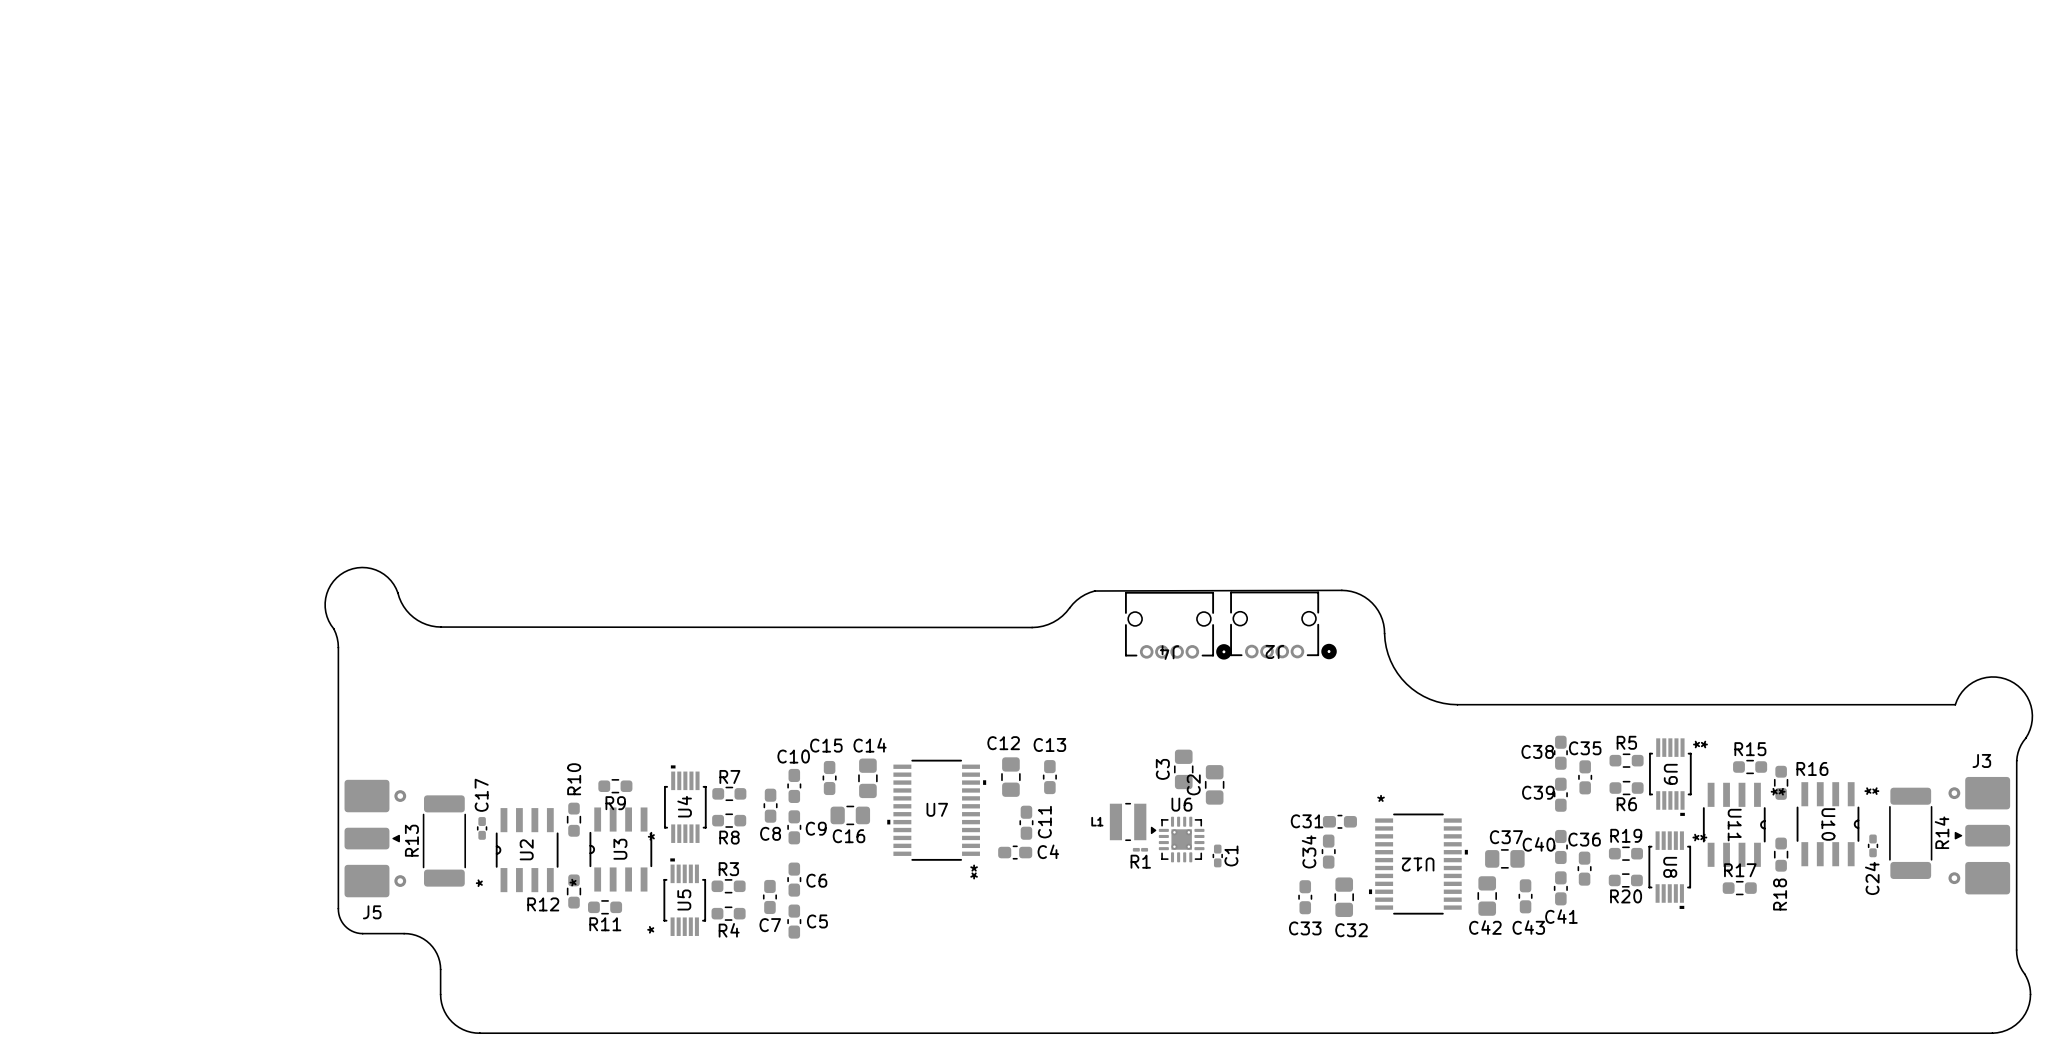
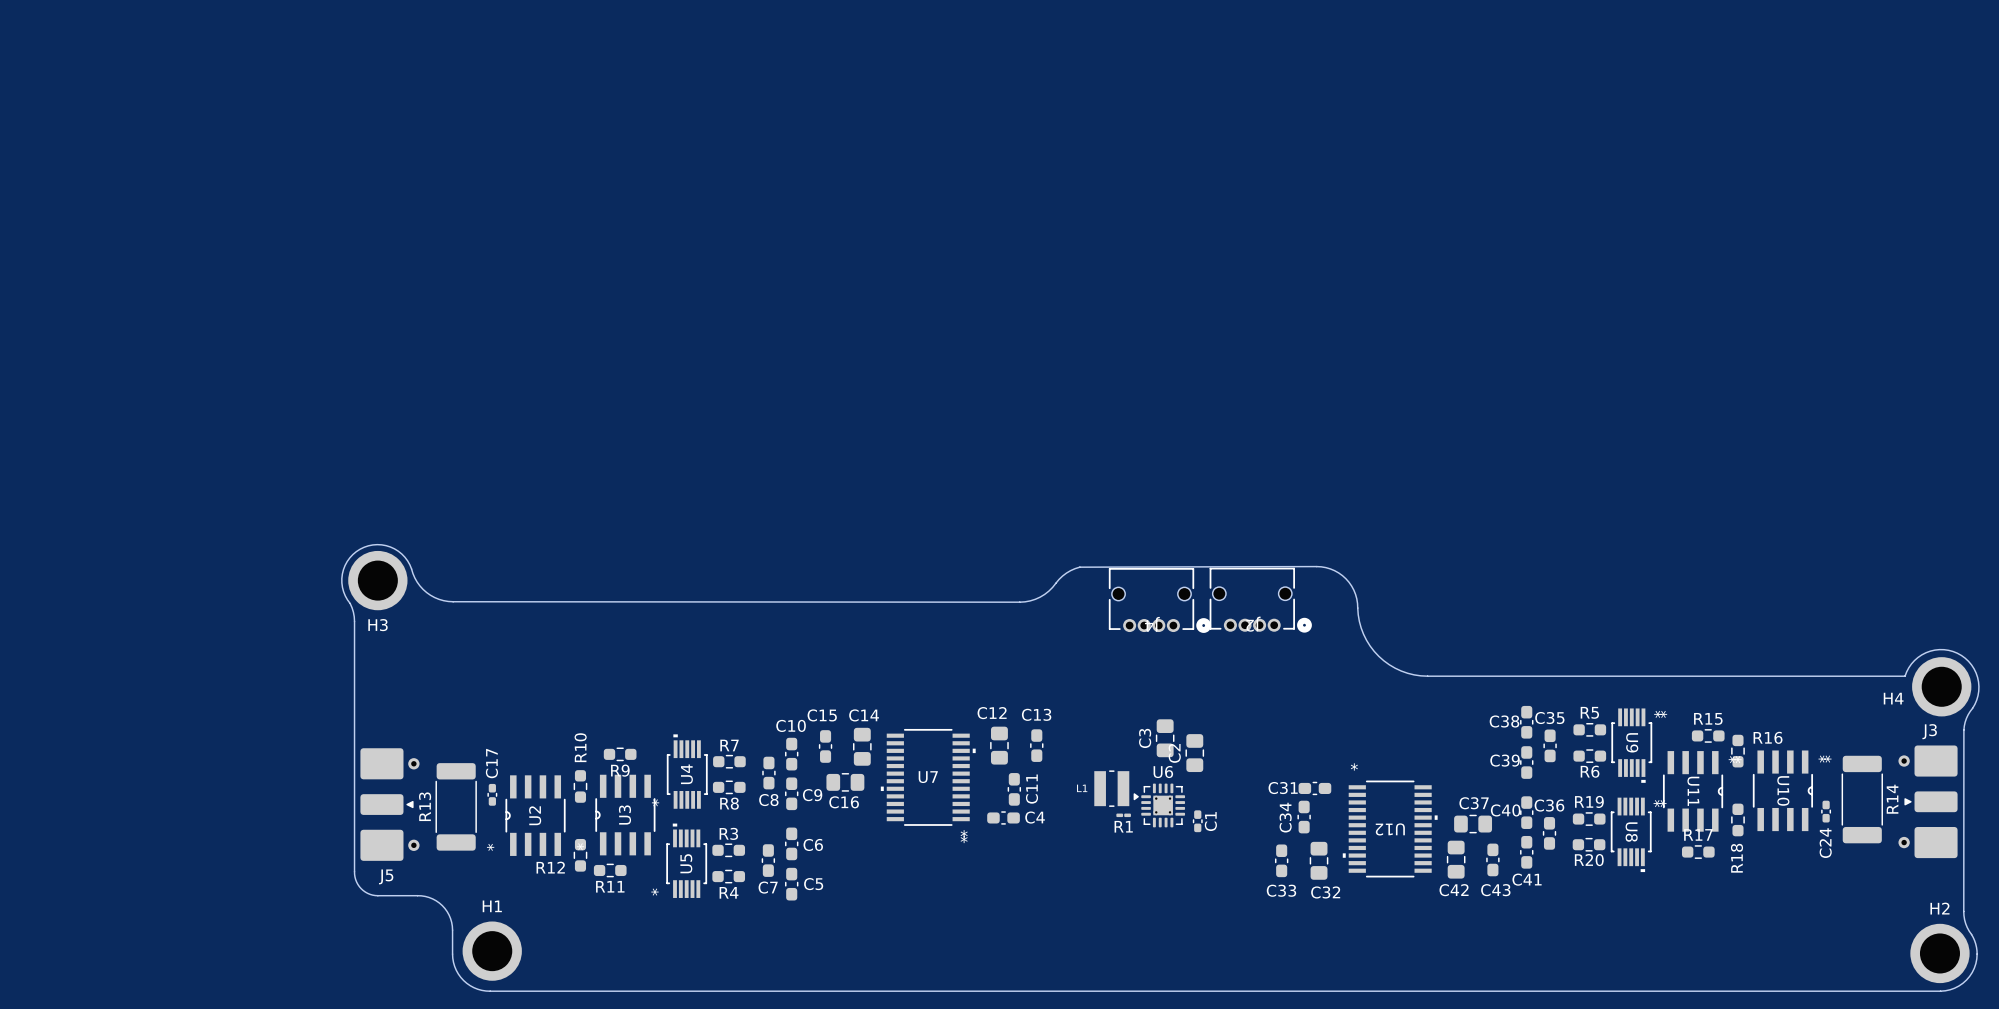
H3: none -> (377, 580)
H4: none -> (1941, 686)
H1: none -> (492, 951)
H2: none -> (1939, 953)

